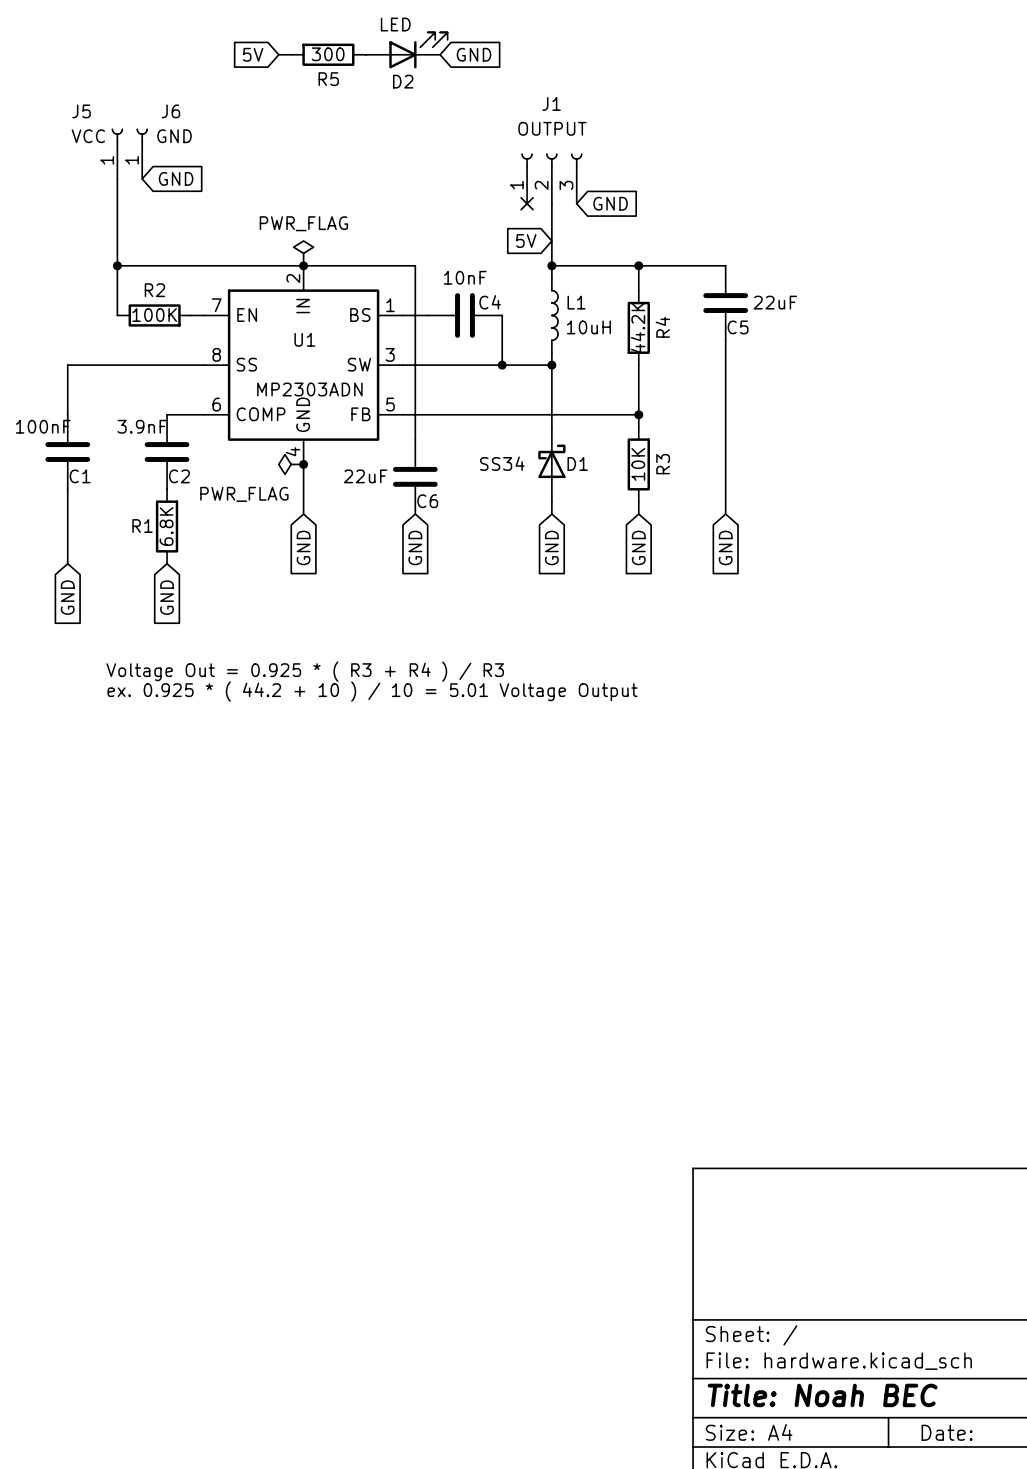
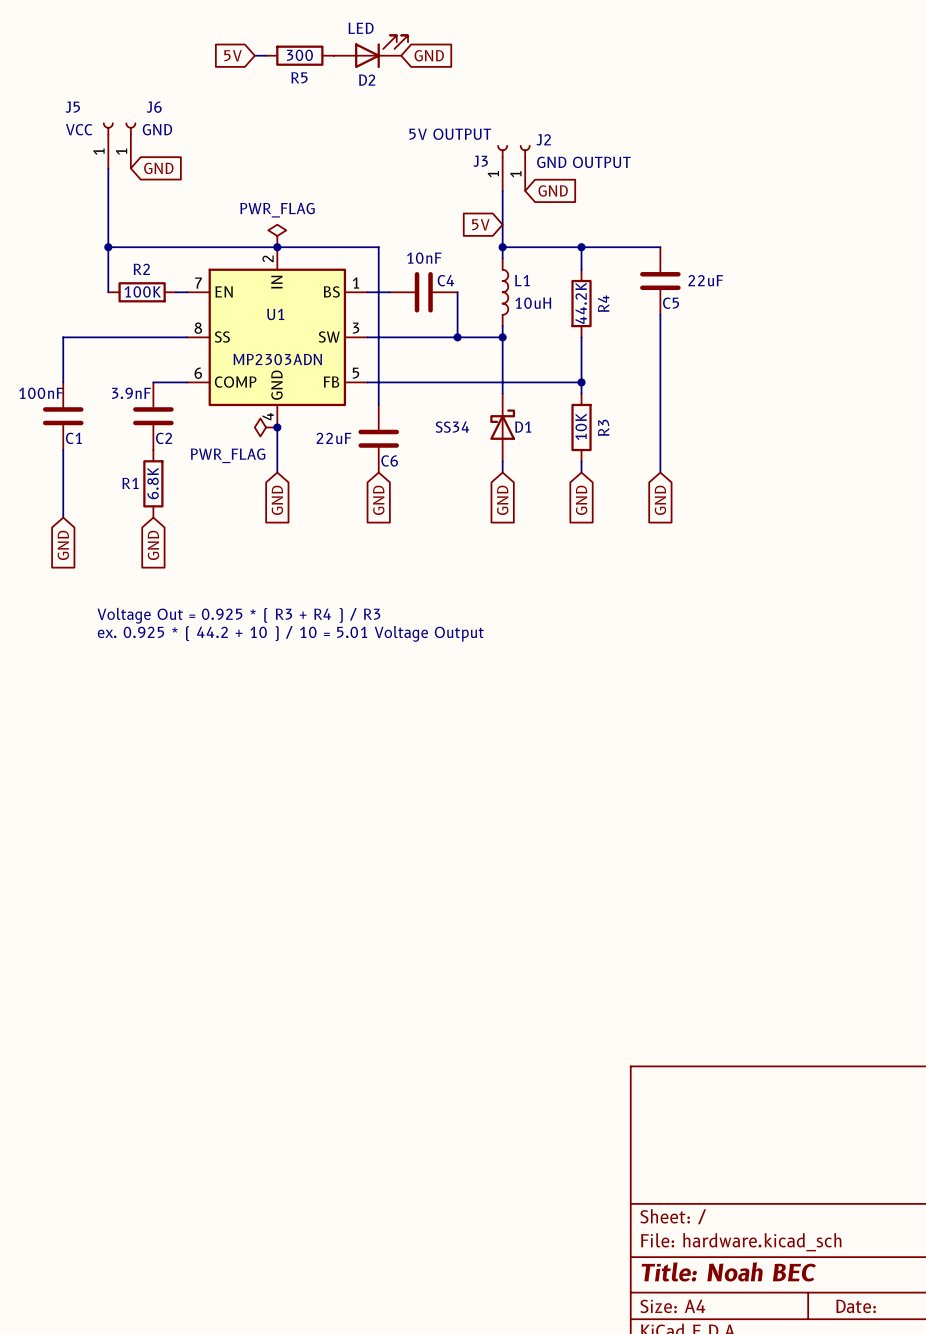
J1: OUTPUT (551, 178) -> none
J3: none -> 5V OUTPUT (502, 168)
J2: none -> GND OUTPUT (525, 168)
no-connect mark: (527, 203) -> none

